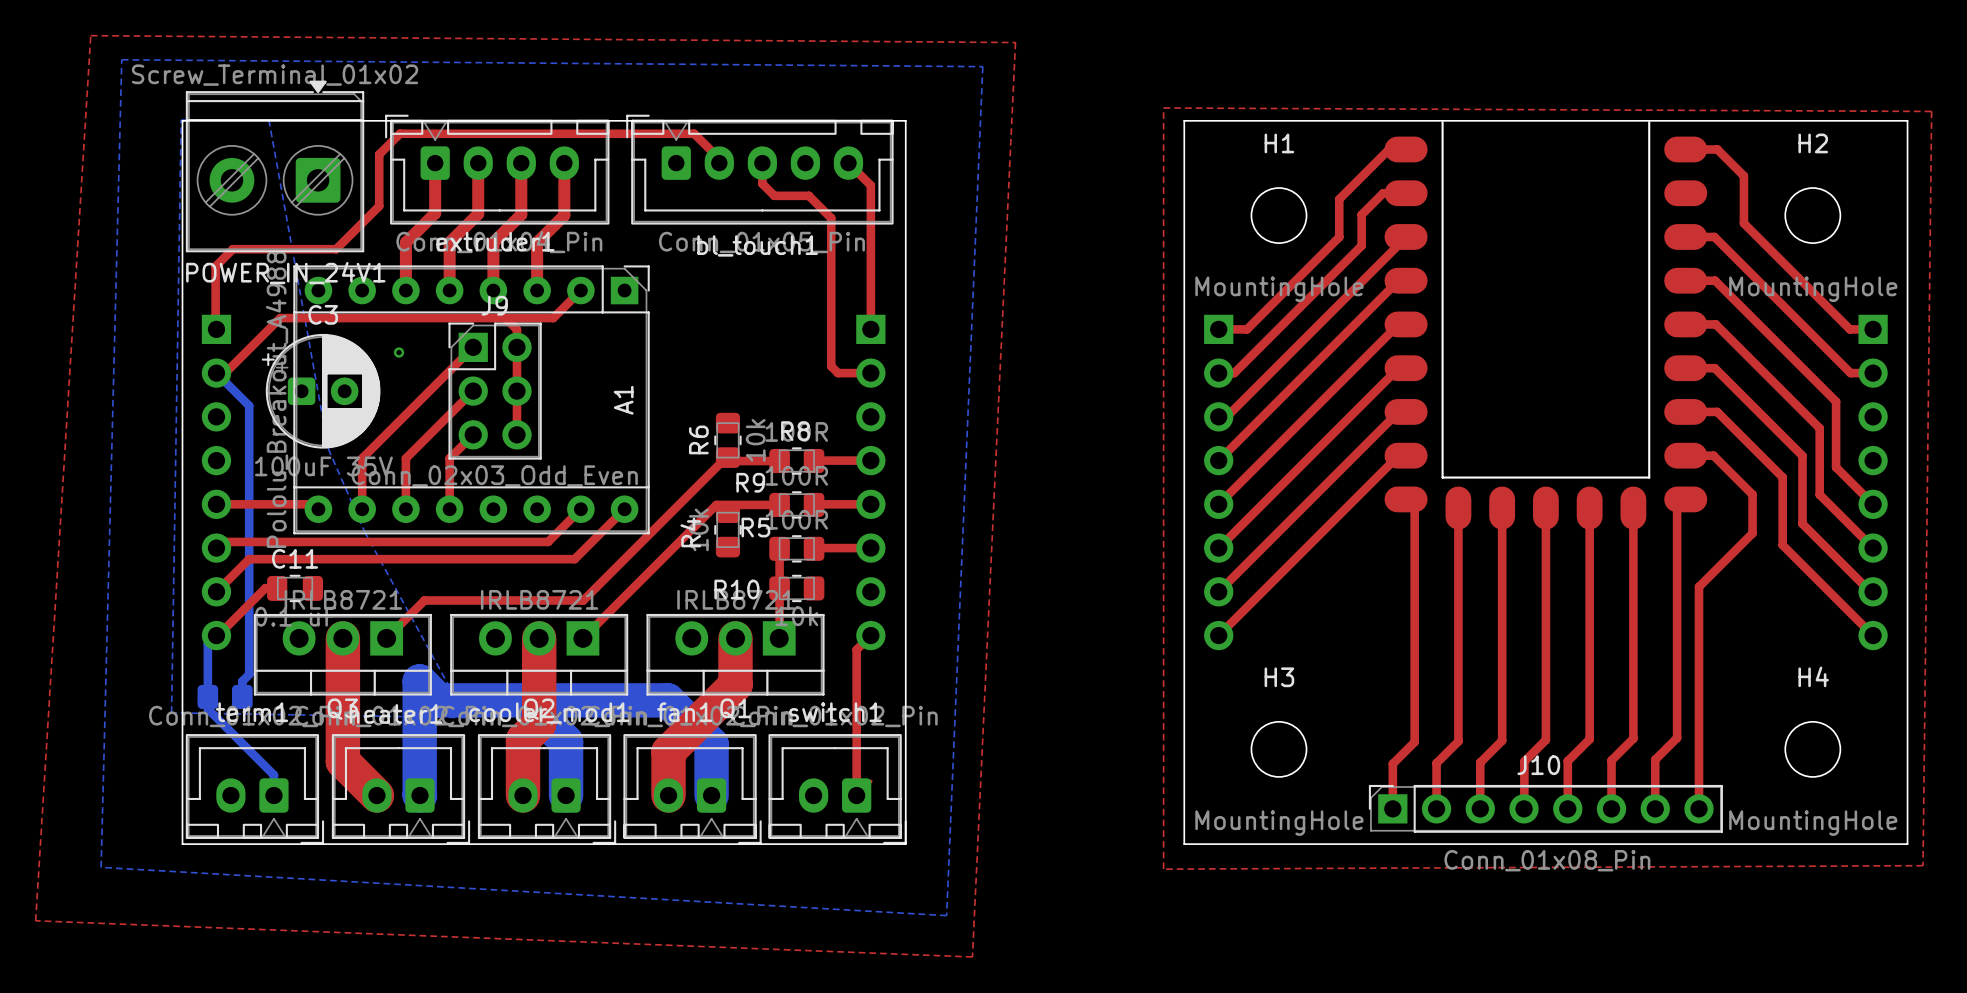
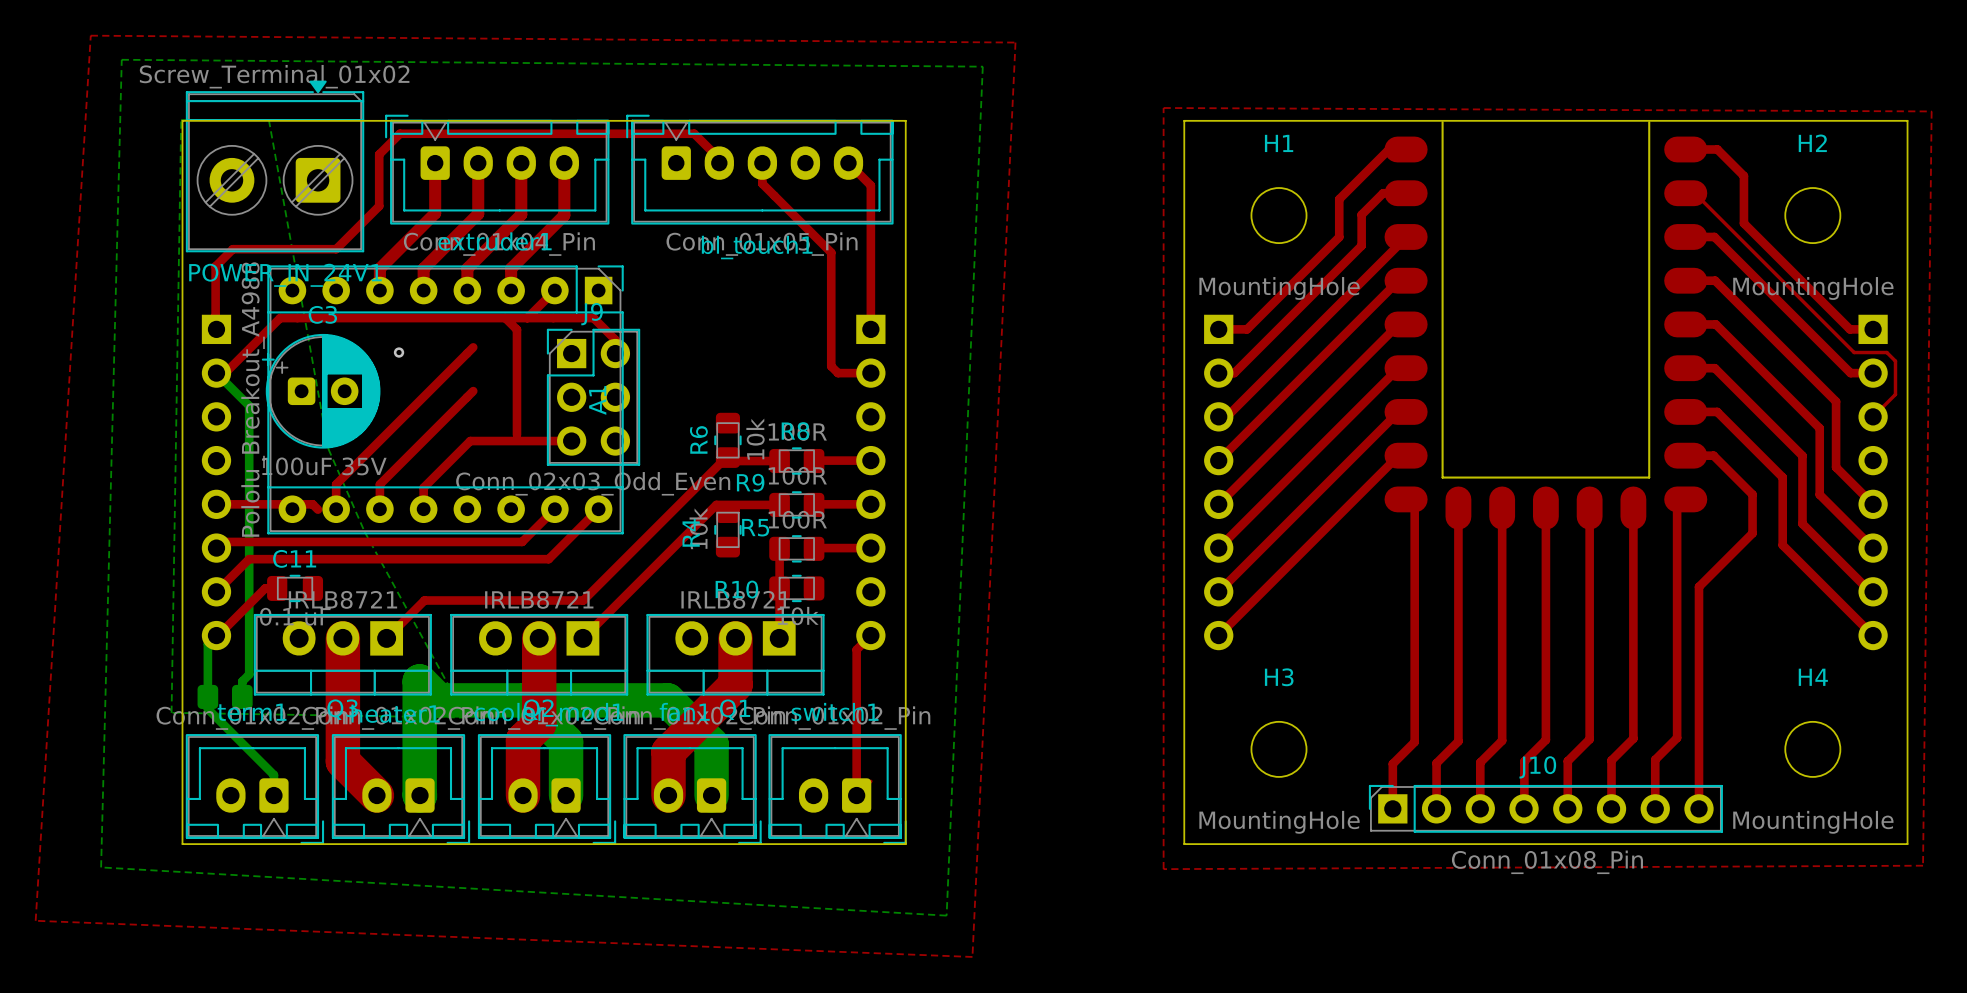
top track: none -> (1677, 193) (1694, 193) (1854, 352) (1886, 352) (1895, 361) (1895, 394) (1873, 416)
top track: (774, 195) (808, 195) (831, 218) (831, 252) -> (774, 195) (831, 252)
top track: (405, 242) (405, 290) -> (405, 242) (379, 268) (379, 290)
top track: (449, 242) (449, 290) -> (449, 242) (423, 268) (423, 290)
top track: (493, 242) (493, 290) -> (493, 242) (467, 268) (467, 290)
top track: (537, 242) (537, 290) -> (537, 242) (511, 268) (511, 290)
top track: none -> (554, 290) (527, 318)
top track: (580, 290) (553, 318) -> (615, 353) (615, 339) (593, 318) (553, 318)
J9 position: (495, 391) -> (593, 397)
A1 position: (471, 399) -> (445, 399)
top track: (473, 437) (473, 434) (449, 458) (449, 509) -> none
top track: none -> (567, 445) (571, 441) (470, 441) (423, 487) (423, 509)
top track: (362, 458) (362, 509) -> (362, 458) (336, 484) (336, 509)
top track: (405, 458) (405, 509) -> (405, 458) (379, 484) (379, 509)
top track: (580, 509) (548, 541) (522, 541) -> (554, 509) (522, 541)
top track: (624, 509) (574, 559) (548, 559) -> (598, 509) (548, 559)

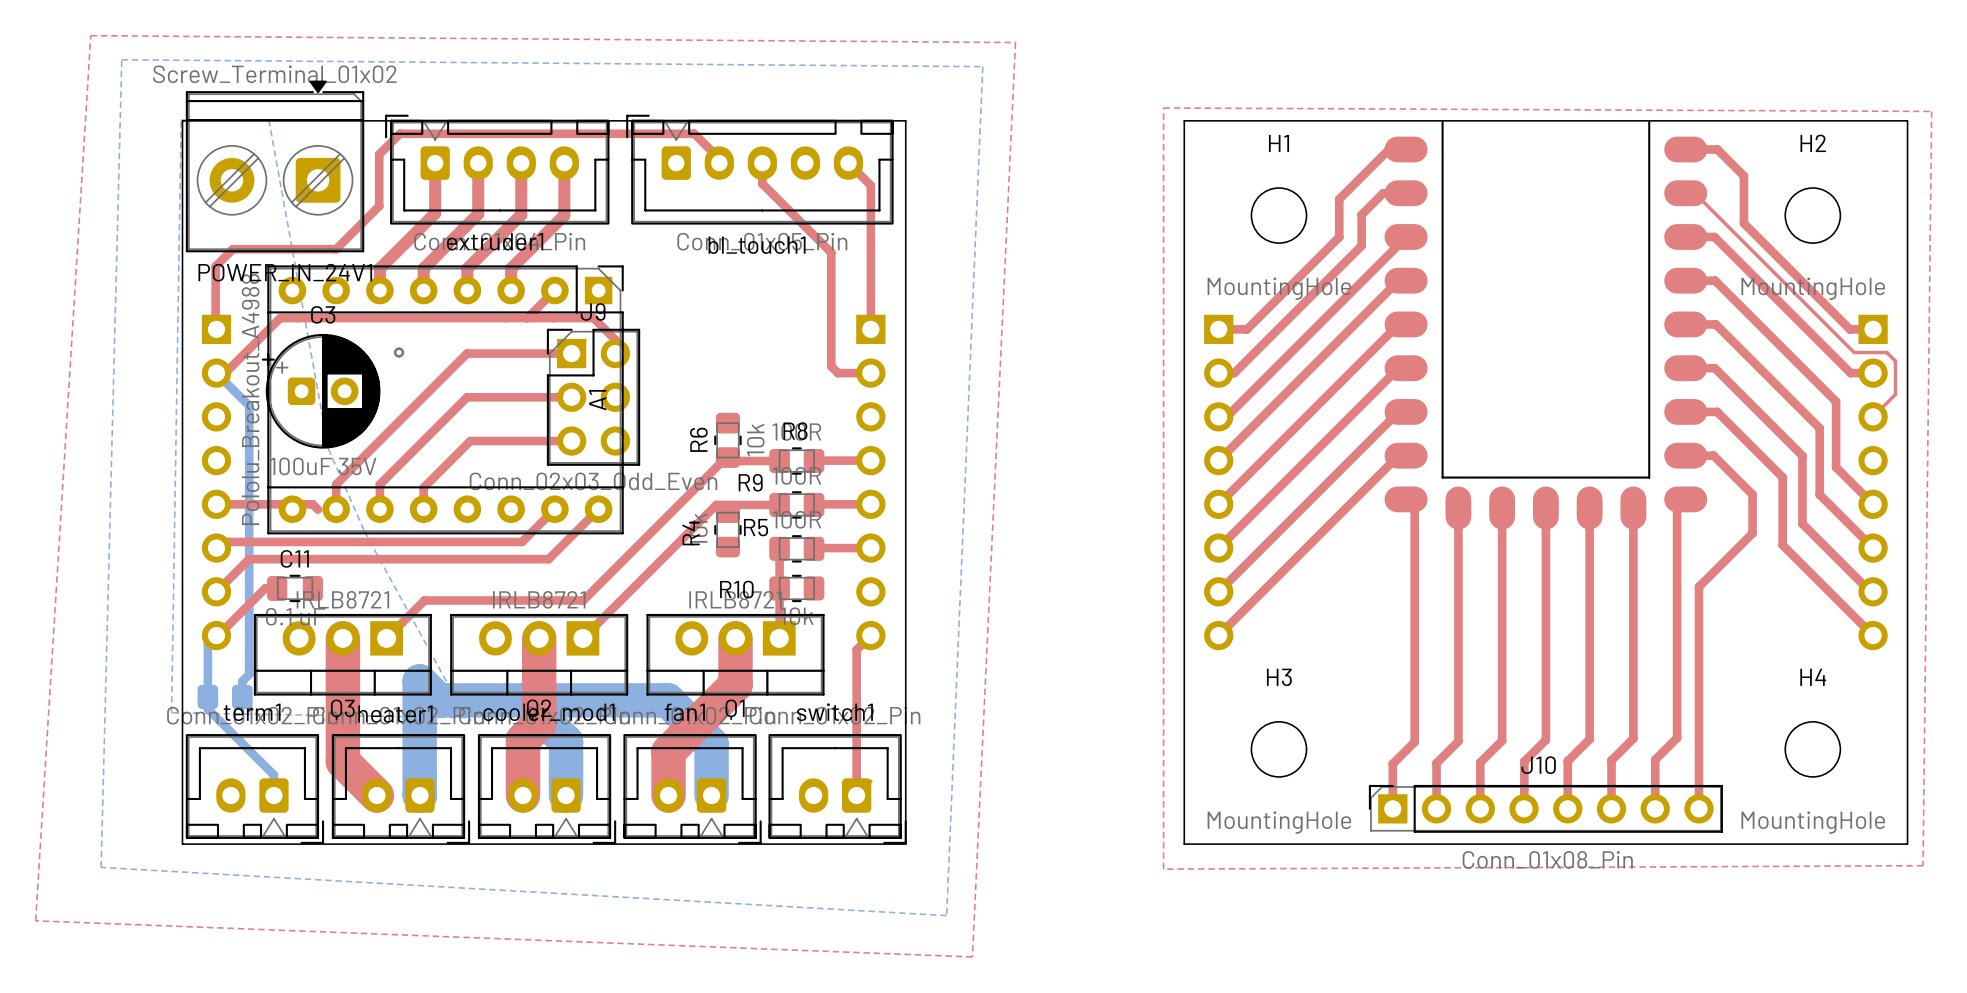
top track: (505, 318) (516, 329) (516, 434) -> none
top track: (473, 350) (473, 347) (467, 353) -> (571, 353) (467, 353)
top track: (473, 393) (473, 391) (467, 397) -> (571, 397) (467, 397)

